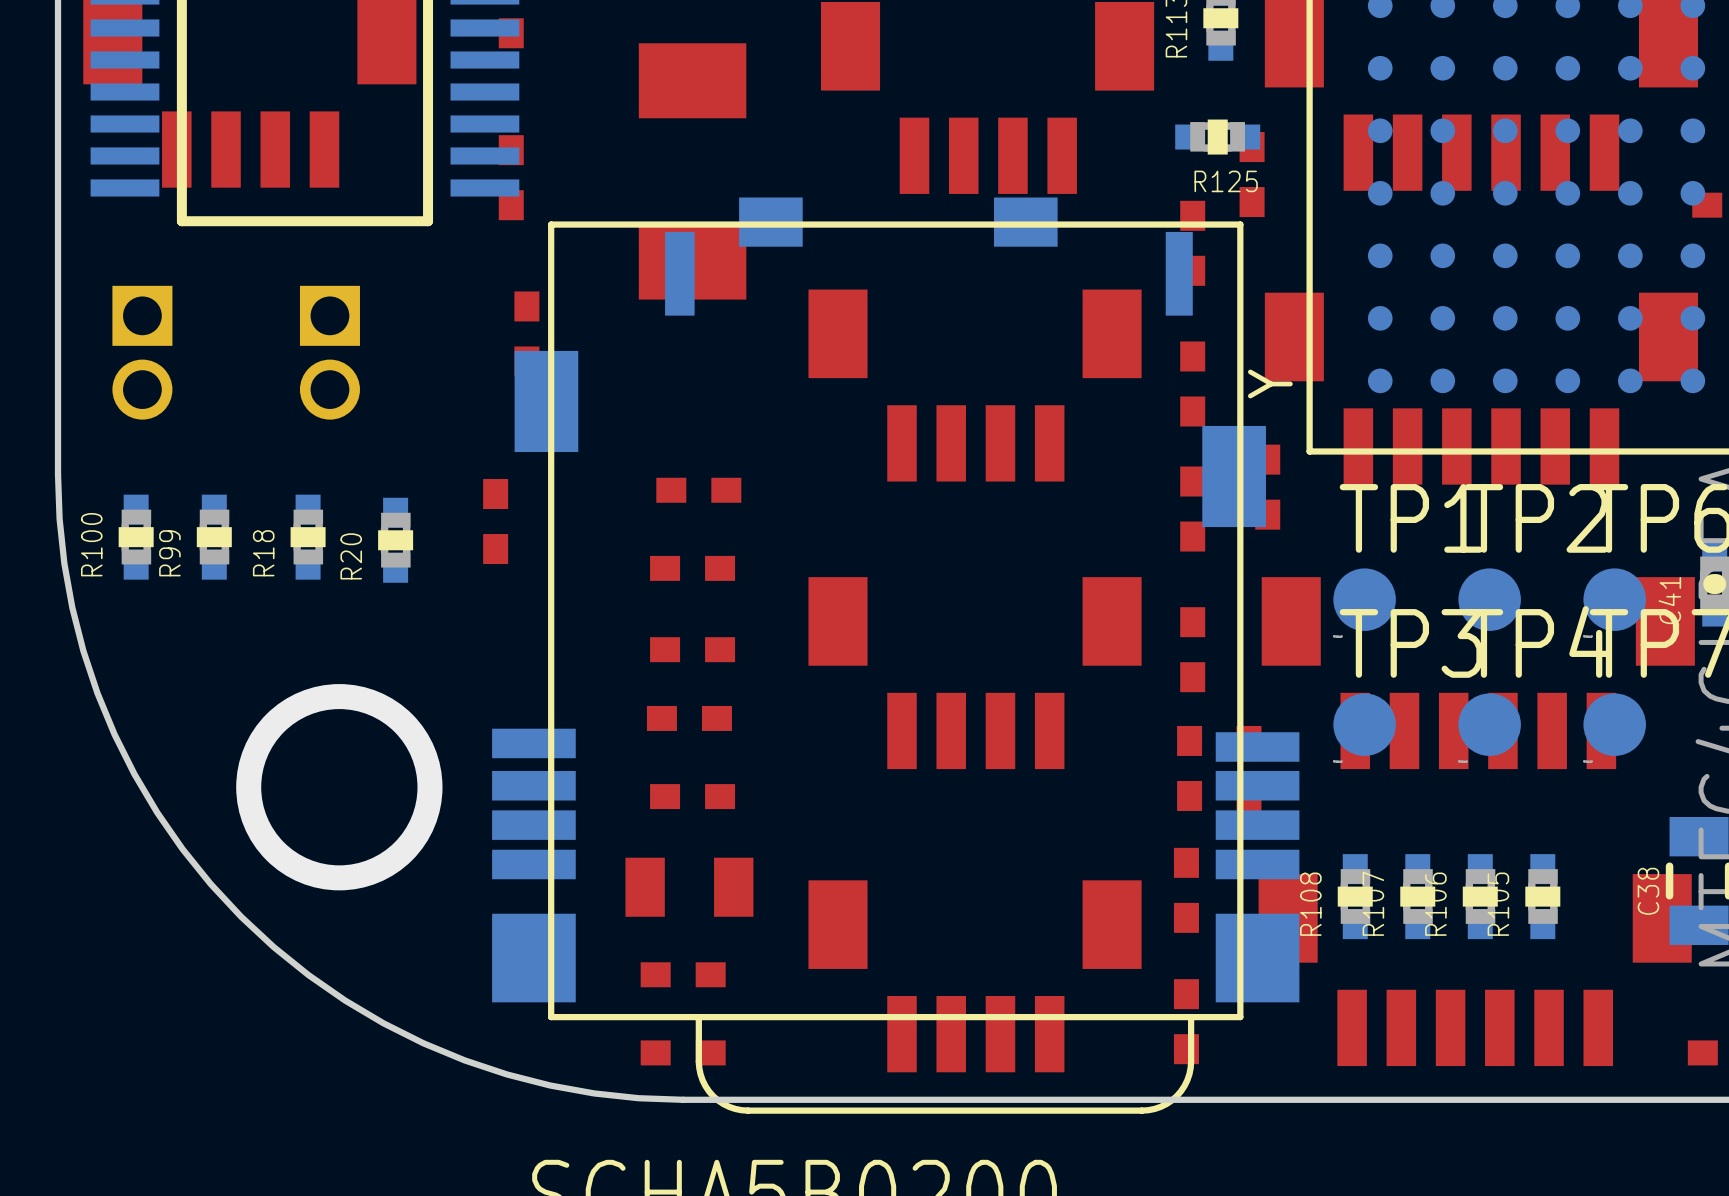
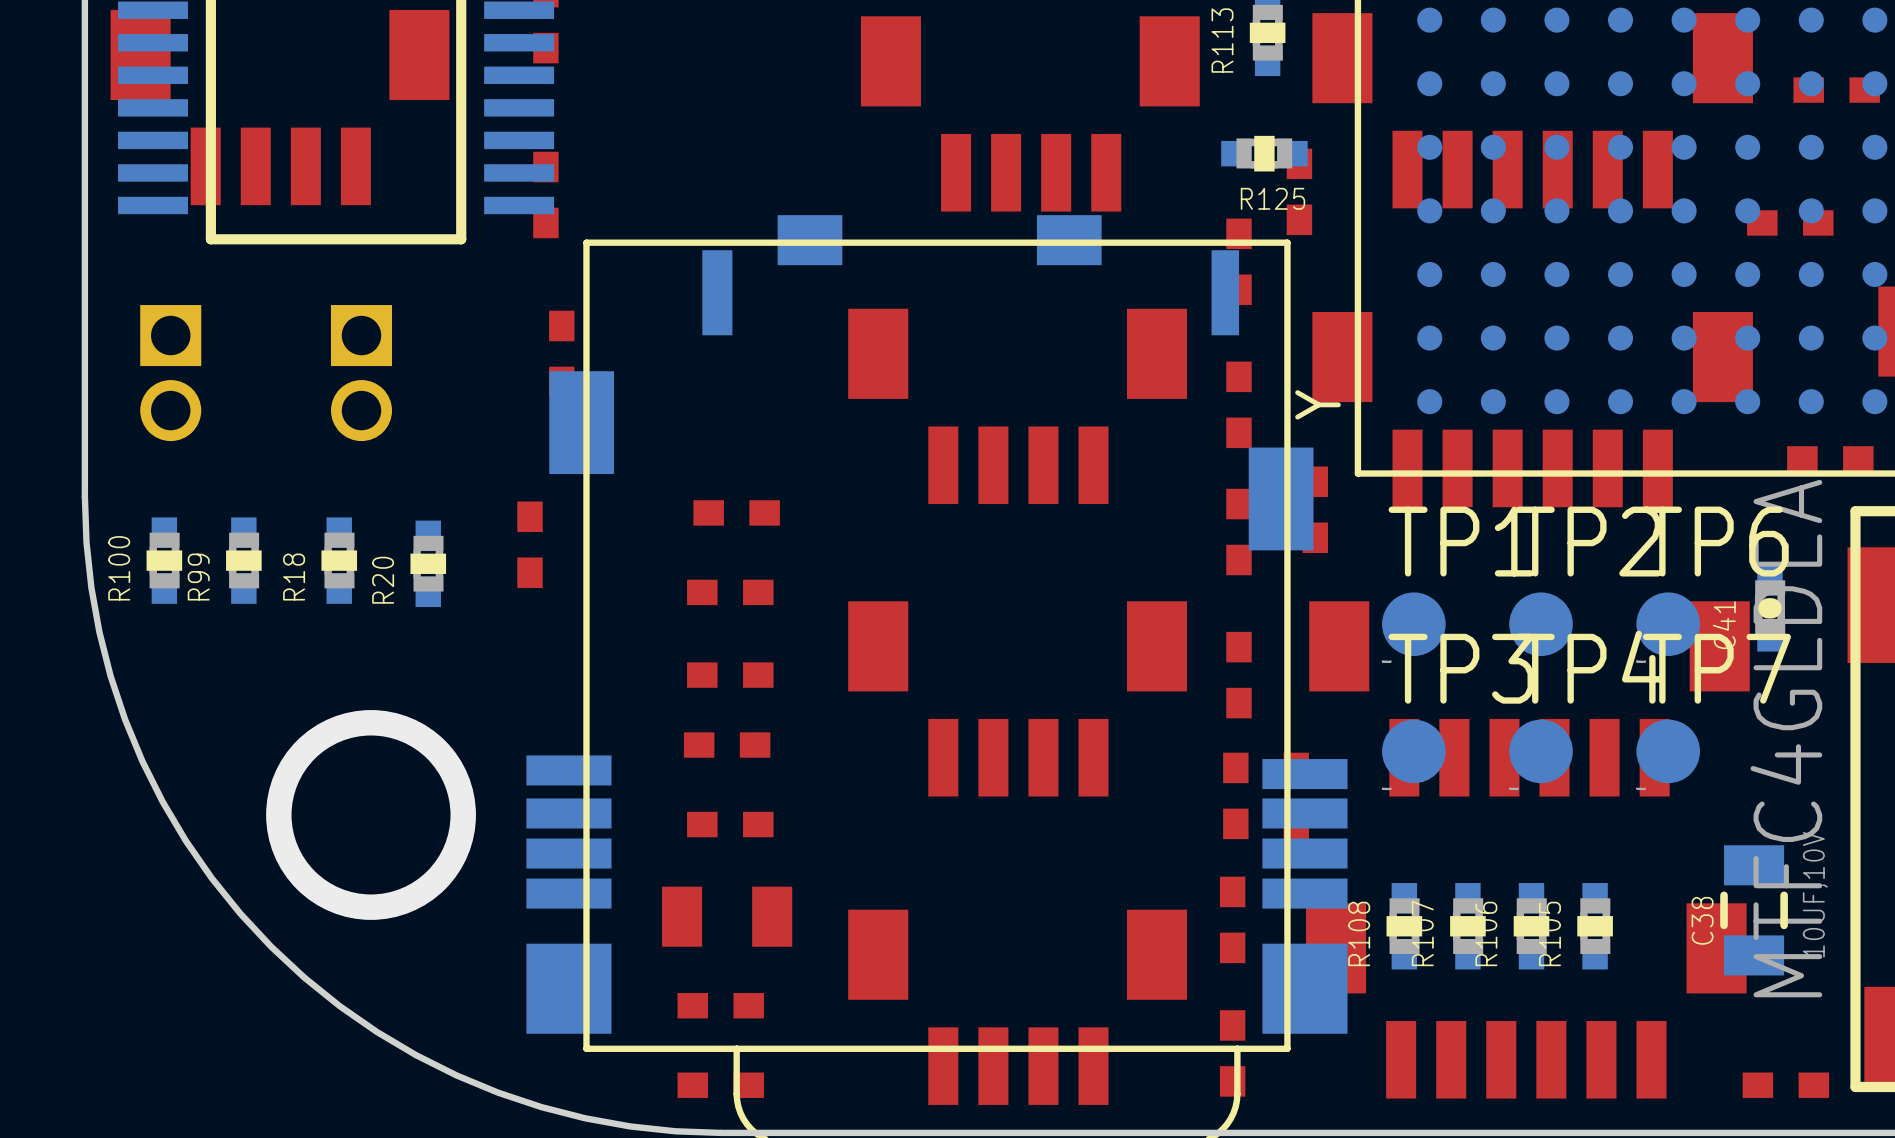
part: (692, 171) -> none

